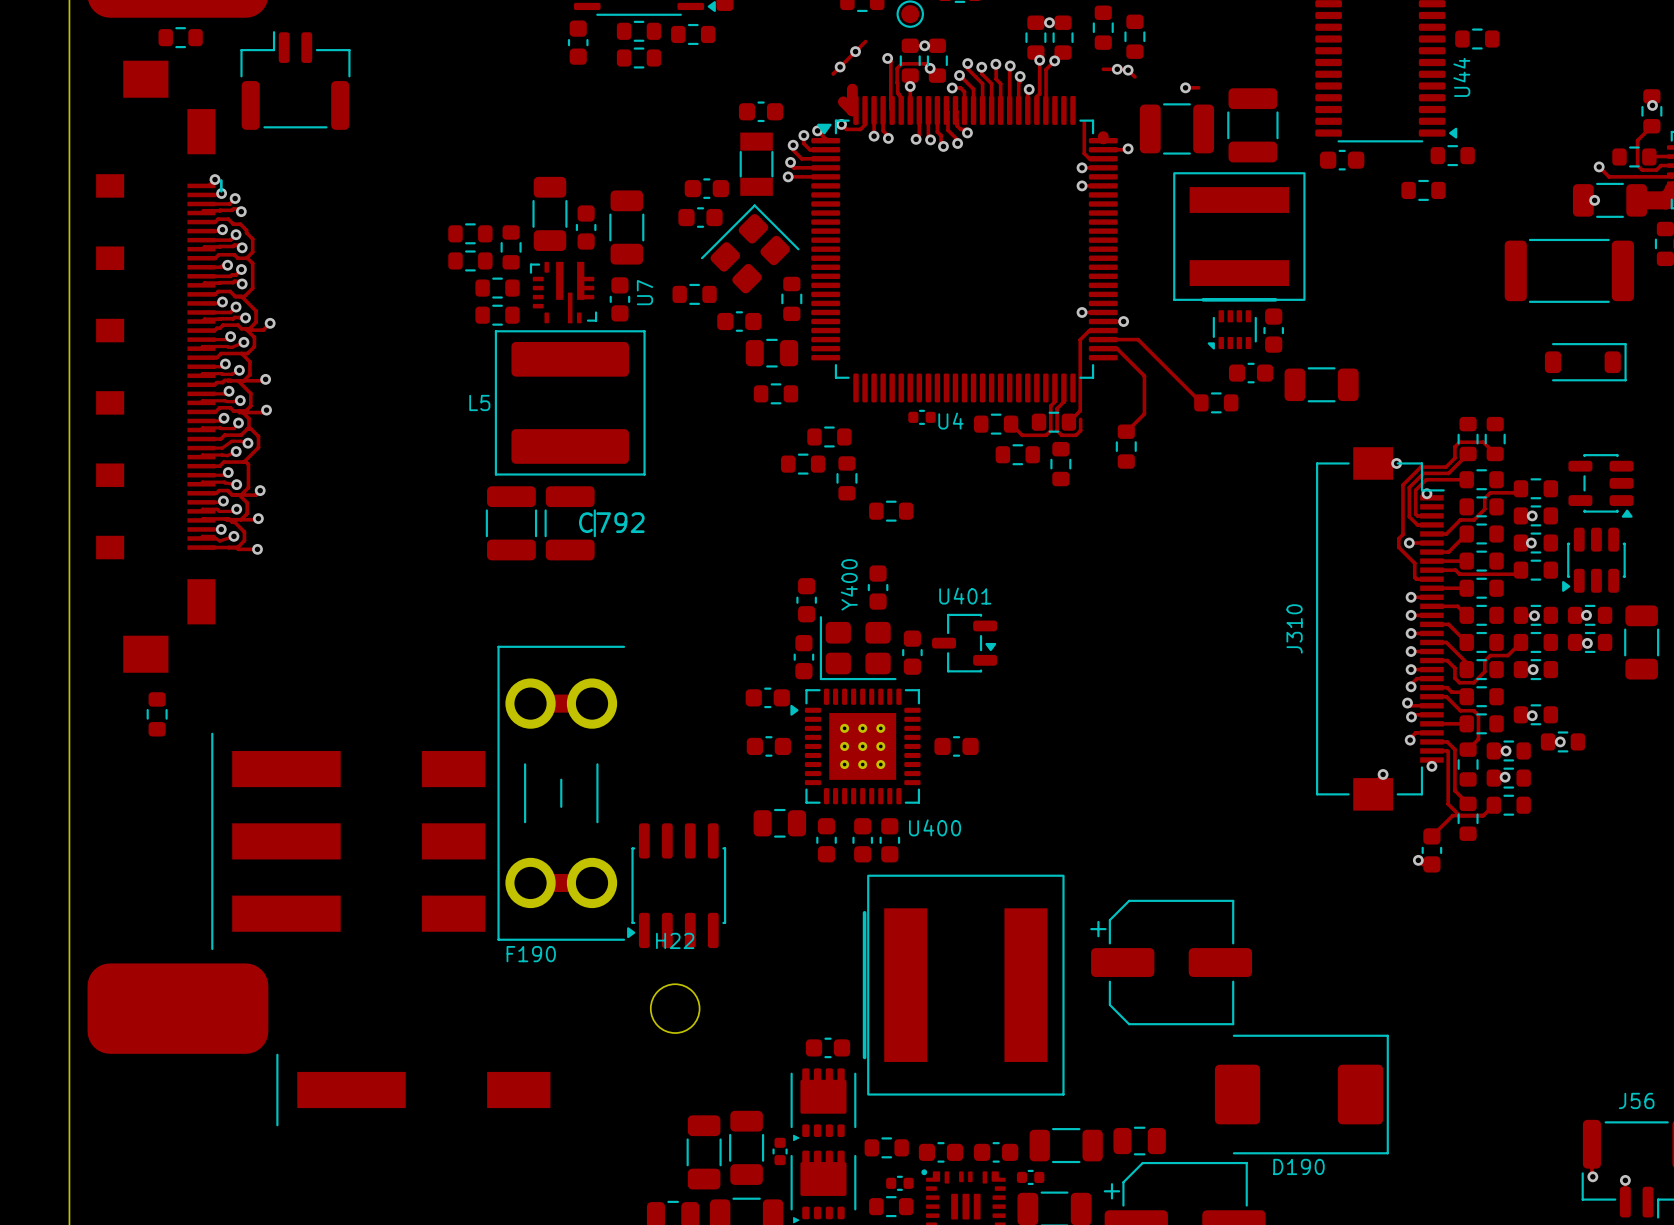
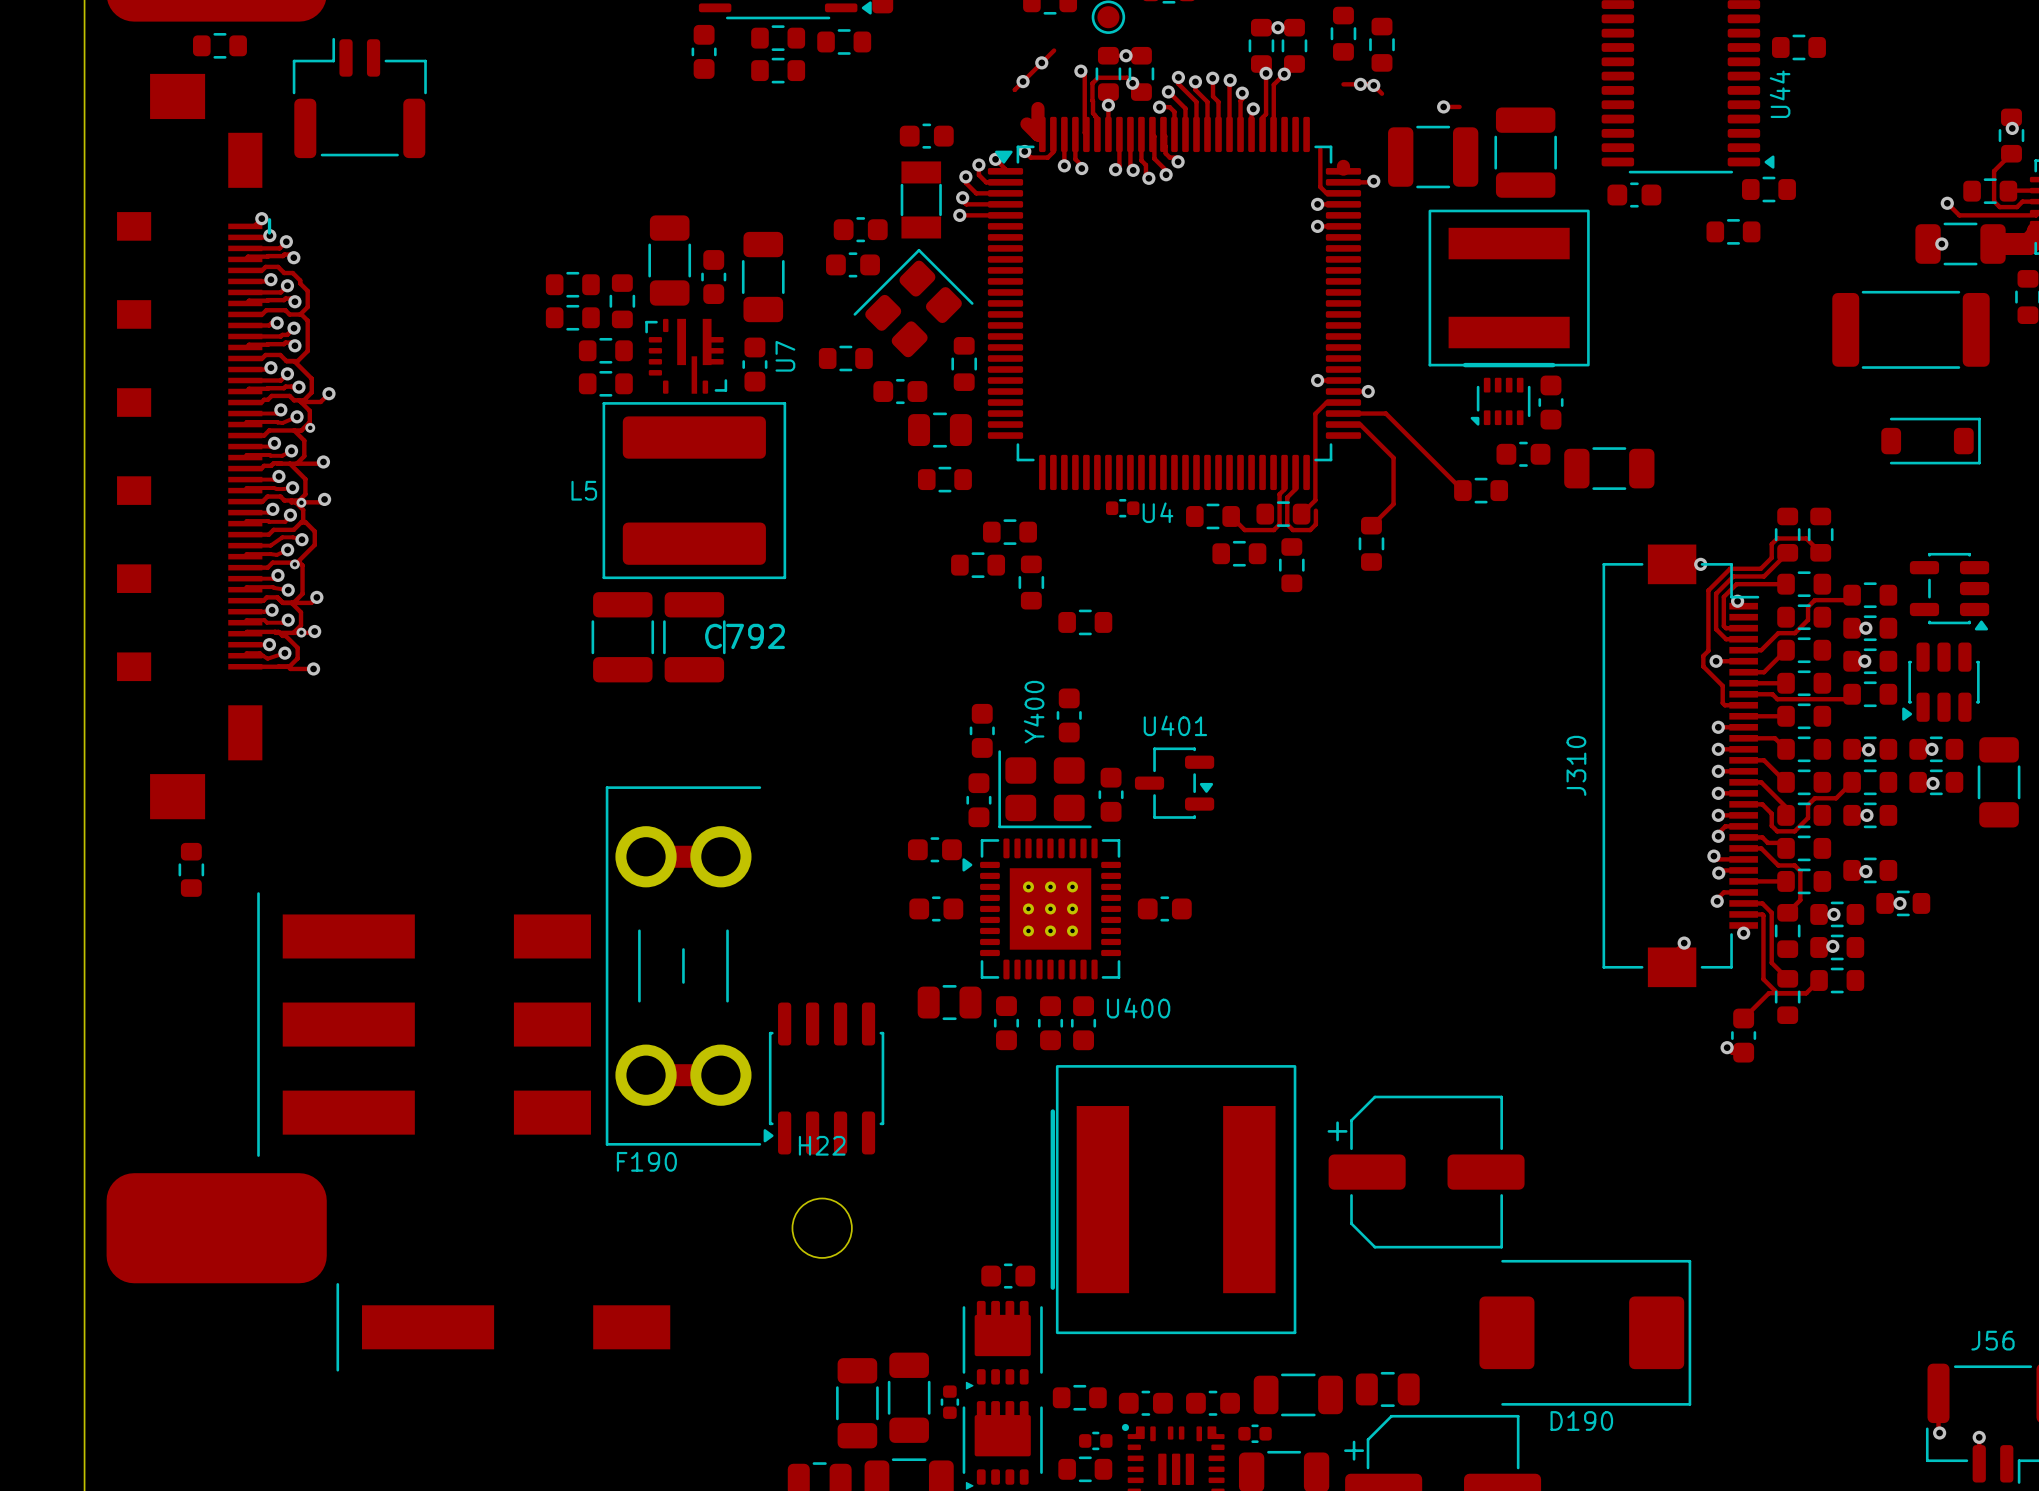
via: none -> (310, 427)
via: none -> (301, 502)
via: none -> (294, 564)
via: none -> (301, 632)

